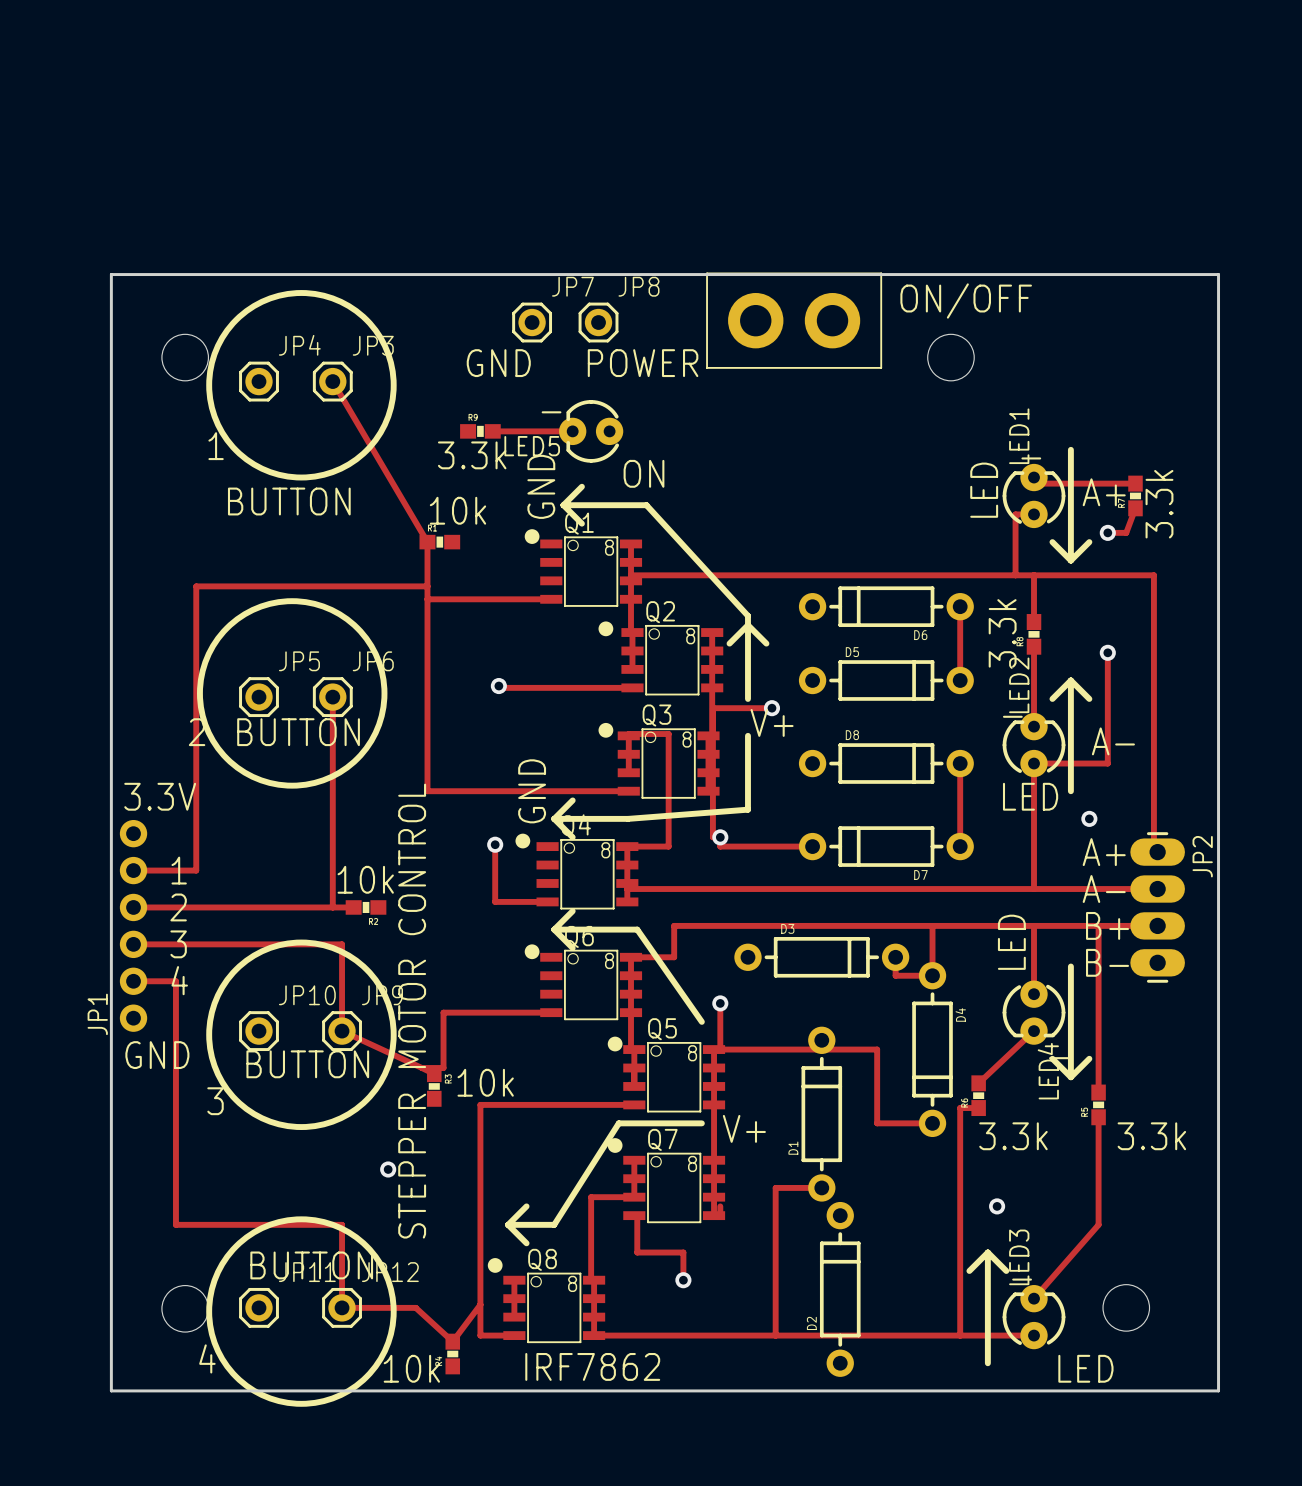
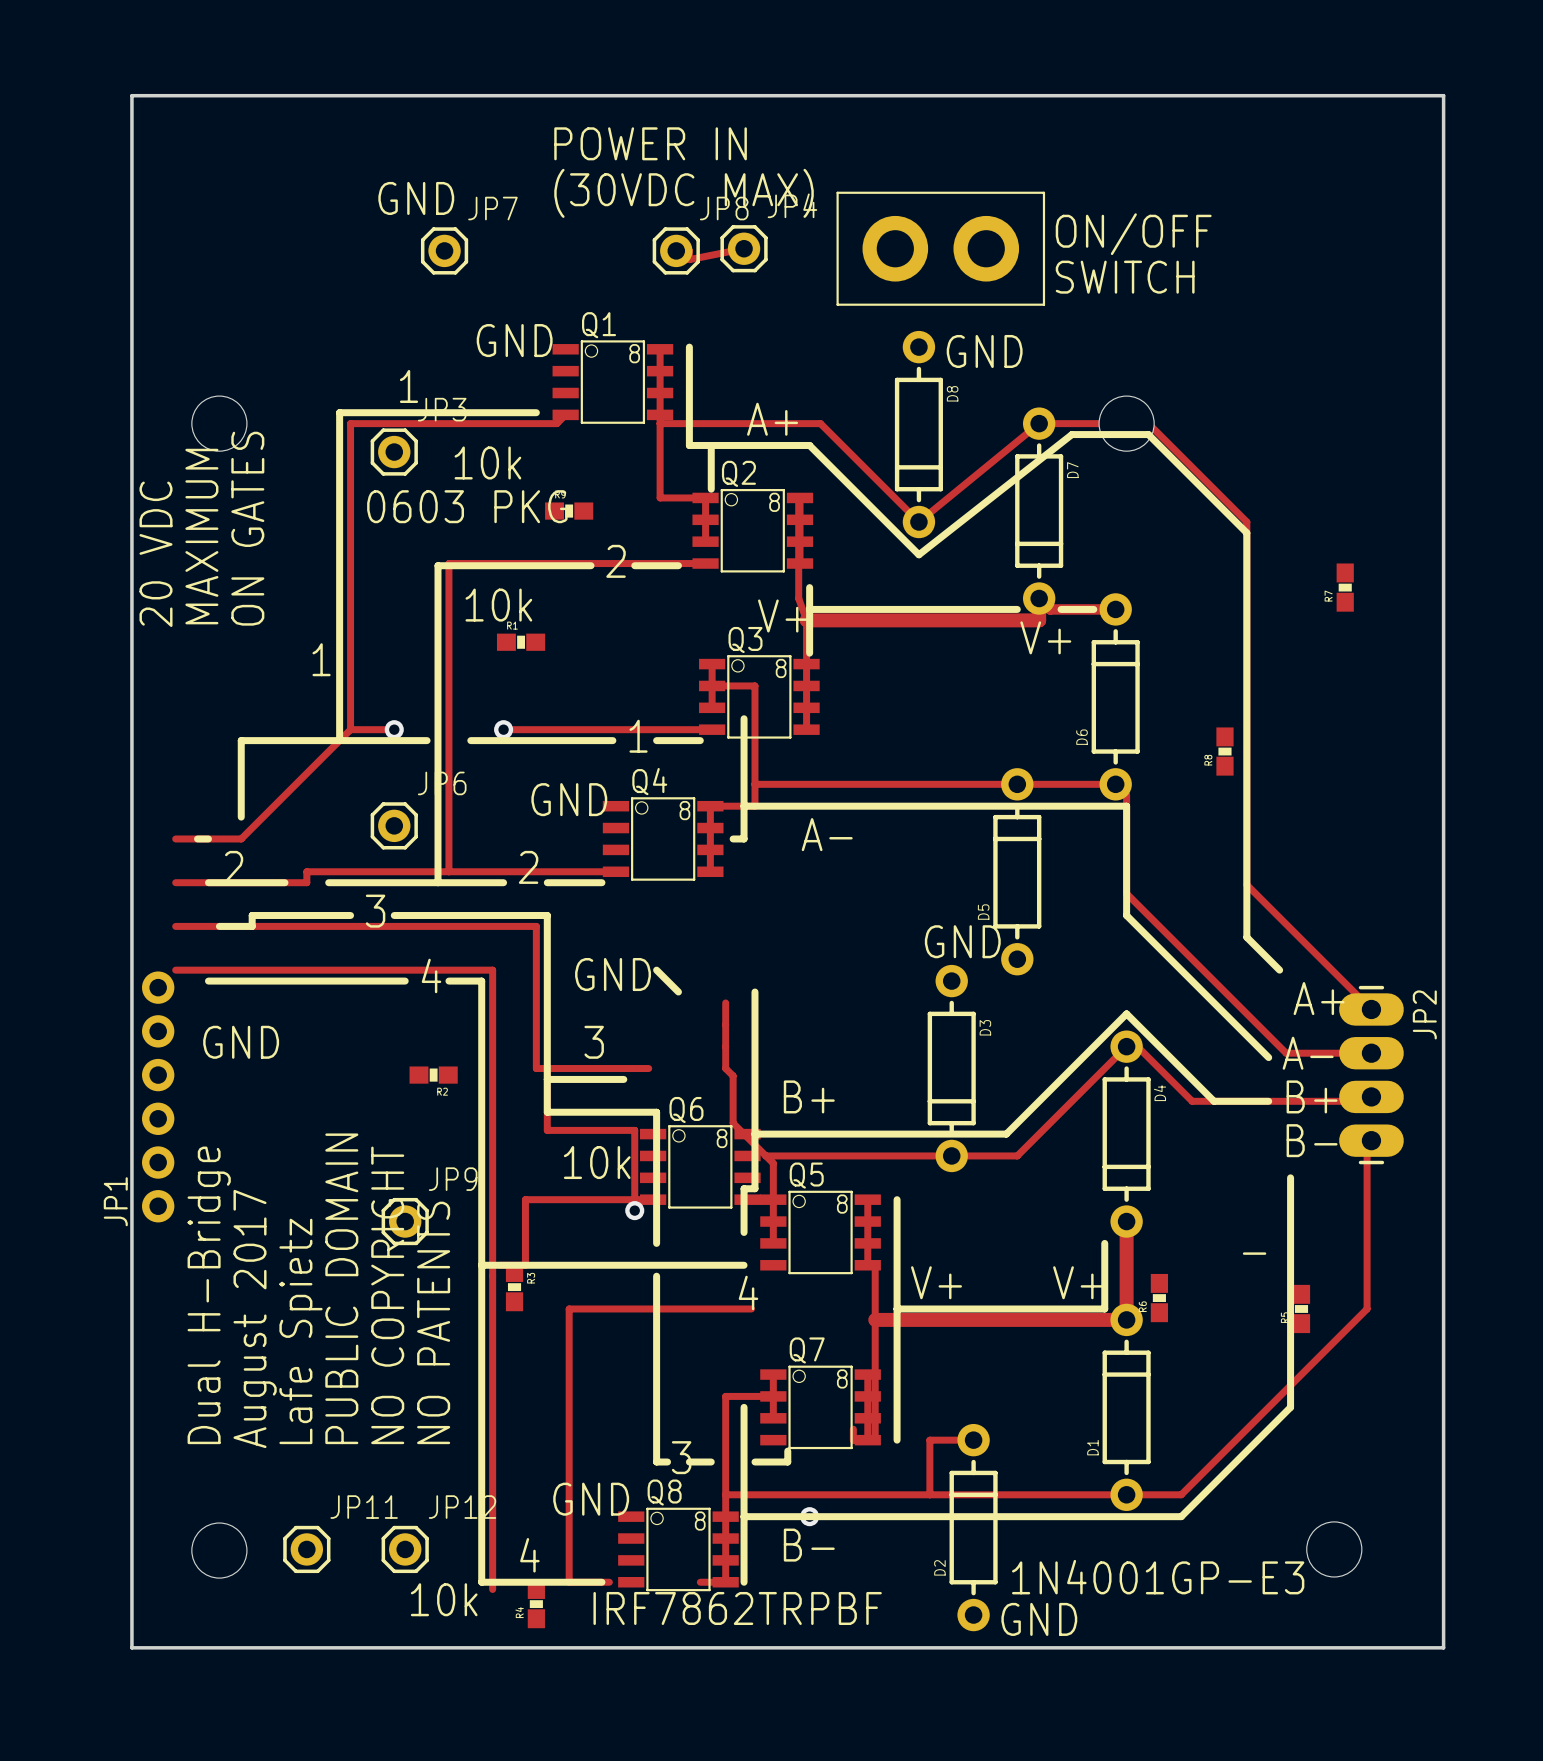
text: none -> POWER IN (650, 143)
text: none -> (30VDC MAX) (684, 193)
text: none -> GND (416, 198)
track: none -> (744, 248) (689, 259) (689, 250) (676, 250)
text: none -> SWITCH (1125, 277)
board edge: (111, 274) (1218, 274) -> (131, 325) (131, 95) (1443, 95) (1443, 325)
drawing: [206, 290, 397, 481] -> none
line: none -> (689, 347) (689, 445) (809, 445) (918, 554) (1071, 434) (1148, 434) (1246, 532) (1246, 937) (1279, 970)
track: none -> (660, 349) (660, 497) (705, 497) (705, 541)
text: none -> GND (984, 351)
text position: ON/OFF (966, 300) -> ON/OFF (1133, 234)
part position: (794, 320) -> (940, 248)
JP7 position: (532, 322) -> (444, 250)
JP8 position: (598, 322) -> (676, 250)
text: none -> 1 (409, 386)
line: none -> (536, 412) (339, 412) (339, 740)
track: none -> (565, 414) (556, 423) (350, 423) (350, 729)
text: none -> A+ (772, 419)
text position: GND (498, 363) -> GND (514, 340)
text: POWER (643, 363) -> none
line: none -> (711, 445) (711, 489)
JP4 position: (259, 381) -> (744, 248)
track: (332, 381) (427, 542) (427, 791) (628, 791) -> none
text: none -> 10k (487, 462)
text: - (551, 412) -> none
text: none -> 0603 PKG (467, 506)
track: (492, 431) (572, 431) -> none
LED5: (591, 431) -> none
text: none -> ON GATES (247, 528)
text: 1 (216, 446) -> none
line: (1070, 449) (1070, 560) -> none
text: none -> MAXIMUM (201, 536)
text: 3.3k (472, 455) -> none
text: - (1031, 458) -> none
text: none -> 20 VDC (155, 554)
text: none -> 2 (616, 561)
text: ON (643, 473) -> none
track: none -> (705, 563) (448, 563) (448, 871)
track: none -> (800, 563) (798, 497) (798, 598) (806, 620)
line: none -> (591, 565) (438, 565) (438, 882)
line: none -> (634, 565) (678, 565)
track: (1034, 477) (1034, 483) (1135, 483) -> none
text: GND (541, 486) -> none
line: (581, 486) (563, 505) -> none
text: LED (984, 490) -> none
text: A+ (1104, 492) -> none
line: none -> (809, 587) (809, 653)
LED1: (1034, 495) -> none
text: BUTTON (289, 501) -> none
text: 3.3k (1159, 504) -> none
line: (563, 505) (646, 505) (747, 615) (747, 698) -> none
line: (563, 505) (581, 523) -> none
track: (1135, 508) (1126, 532) (1107, 532) -> none
text position: 10k (457, 510) -> 10k (498, 605)
line: none -> (809, 609) (1017, 609)
line: none -> (1061, 609) (1093, 609)
track: none -> (1115, 609) (1050, 609) (1039, 598) (1039, 620) (806, 620)
track: (1034, 514) (1015, 514) (1015, 575) -> none
text: none -> V+ (783, 616)
track: none -> (806, 620) (806, 729)
drawing: [524, 529, 540, 544] -> none
via: (1107, 532) -> none
text: none -> V+ (1045, 637)
line: (1052, 542) (1070, 560) -> none
line: (1089, 542) (1070, 560) -> none
track: (631, 543) (632, 669) -> none
text: none -> 1 (321, 659)
track: none -> (712, 664) (712, 707)
Q1 position: (591, 571) -> (612, 382)
track: (631, 575) (1153, 575) (1153, 852) (1157, 852) -> (660, 423) (820, 423) (918, 522) (1039, 423) (1148, 423) (1246, 522) (1246, 884) (1371, 1009)
track: (1034, 575) (1034, 622) -> none
track: none -> (712, 685) (754, 685) (754, 806) (710, 806) (710, 871)
track: (427, 586) (196, 586) (196, 870) (133, 870) -> none
drawing: [197, 598, 388, 789] -> none
track: (427, 599) (551, 599) -> none
line: none -> (744, 718) (744, 838) (733, 838)
D6 rotation: 0° (886, 606) -> 90° clockwise (1115, 696)
track: (960, 606) (960, 680) -> none
track: none -> (350, 729) (241, 838) (175, 838)
track: none -> (350, 729) (394, 729)
via: none -> (394, 729)
track: none -> (503, 729) (712, 729)
via: none -> (503, 729)
text: none -> 1 (638, 736)
drawing: [598, 621, 614, 637] -> none
line: none -> (427, 740) (241, 740) (241, 817)
line: none -> (470, 740) (612, 740)
line: none -> (656, 740) (700, 740)
track: (712, 632) (712, 735) (708, 735) (708, 791) (712, 791) -> none
text: 3.3k (1002, 633) -> none
line: (729, 643) (747, 625) (766, 643) -> none
track: (1034, 646) (1034, 726) -> none
track: (1107, 652) (1107, 763) (1034, 763) (1034, 889) -> none
via: (1107, 652) -> none
Q2 position: (672, 660) -> (752, 530)
text: none -> GND (569, 799)
line: none -> (744, 806) (1126, 806) (1126, 915) (1268, 1057)
D5 rotation: 0° (886, 680) -> 90° counterclockwise (1017, 871)
line: (1070, 680) (1070, 791) -> none
line: (1070, 680) (1052, 698) -> none
line: (1070, 680) (1089, 698) -> none
track: (498, 686) (498, 687) (632, 687) -> none
via: (498, 686) -> none
JP5: (259, 697) -> none
track: (332, 697) (332, 907) -> none
text: none -> A- (827, 834)
line: none -> (197, 838) (208, 838)
track: (771, 708) (712, 708) (712, 837) (720, 837) (720, 846) (812, 846) -> none
via: (771, 708) -> none
text: - (1012, 716) -> none
drawing: [598, 722, 614, 738] -> none
text: V+ (772, 722) -> none
text: BUTTON (298, 732) -> none
text: none -> 2 (528, 867)
track: none -> (615, 871) (306, 871) (306, 882) (175, 882)
line: (747, 735) (747, 809) (628, 818) (554, 818) (572, 800) -> none
text: A- (1113, 741) -> none
line: none -> (208, 882) (284, 882)
line: none -> (328, 882) (503, 882)
line: none -> (547, 882) (601, 882)
LED2: (1034, 745) -> none
Q3 position: (668, 763) -> (759, 696)
D8 rotation: 0° (886, 763) -> 90° clockwise (918, 434)
D8 position: (886, 763) -> (918, 434)
track: (960, 763) (960, 846) -> none
text: none -> 3 (375, 911)
line: none -> (350, 915) (252, 915) (252, 926) (219, 926)
line: none -> (394, 915) (547, 915) (547, 1112) (656, 1112) (656, 1243)
track: (628, 772) (628, 734) (668, 734) (668, 846) (627, 846) (627, 901) -> none
text rotation: 0° (532, 791) -> 90° clockwise (613, 974)
text: none -> GND (962, 941)
text: 3.3V (160, 796) -> none
text: LED (1030, 796) -> none
track: none -> (175, 970) (492, 970) (492, 1589)
via: (1089, 818) -> none
text: none -> 4 (431, 975)
line: none -> (208, 981) (405, 981)
line: none -> (448, 981) (481, 981) (481, 1582) (601, 1582)
drawing: [515, 833, 531, 849] -> none
line: none -> (754, 992) (754, 1188) (744, 1188) (744, 1232)
via: (720, 837) -> none
track: (495, 844) (495, 901) -> (175, 926) (536, 926) (536, 1068) (586, 1068)
via: (495, 844) -> none
track: none -> (725, 1002) (725, 1068) (733, 1075) (733, 1123) (773, 1163) (773, 1243)
D7 rotation: 0° (886, 846) -> 90° counterclockwise (1039, 511)
D7 position: (886, 846) -> (1039, 511)
text position: A+ (1104, 852) -> A+ (1319, 998)
text: 1 (179, 870) -> none
Q4 position: (587, 874) -> (663, 838)
text: 10k (365, 879) -> none
text: none -> 3 (594, 1042)
track: (627, 889) (1085, 889) -> (754, 784) (1115, 784) (1126, 795) (1126, 893) (1286, 1053)
track: none -> (547, 1068) (547, 1130) (634, 1130) (634, 1210)
track: (133, 907) (353, 907) -> none
text: 2 (178, 907) -> none
line: none -> (547, 1079) (623, 1079)
line: (572, 911) (554, 929) -> none
text: none -> B+ (809, 1096)
track: (932, 925) (932, 975) (895, 975) (895, 957) -> none
track: (1034, 925) (1034, 994) -> none
track: (1098, 925) (1098, 1092) -> none
track: (1157, 925) (674, 925) (674, 957) (631, 957) (631, 1049) (634, 1049) (634, 1086) -> (1371, 1096) (1367, 1101) (1192, 1101) (1137, 1046) (1126, 1046) (1017, 1155) (765, 1155)
line: (554, 929) (637, 929) (701, 1021) -> none
line: (554, 929) (572, 948) -> none
line: none -> (1268, 1101) (1214, 1101) (1126, 1013) (1006, 1134) (754, 1134)
drawing: [206, 939, 397, 1131] -> none
text: LED (1011, 942) -> none
track: (133, 944) (342, 944) (342, 1031) (434, 1074) -> none
text: 3 (178, 944) -> none
drawing: [524, 944, 540, 960] -> none
D3 rotation: 0° (821, 957) -> 90° clockwise (951, 1068)
track: none -> (1371, 1140) (1367, 1145) (1367, 1308) (1181, 1494) (725, 1494)
line: (1070, 966) (1070, 1077) -> none
text: 4 (179, 980) -> none
track: (133, 981) (175, 981) (175, 1224) (342, 1224) (342, 1307) (415, 1307) (452, 1341) (480, 1304) -> none
text: none -> 10k (597, 1162)
line: none -> (1290, 1177) (1290, 1407) (1181, 1516) (744, 1516)
track: (720, 1003) (720, 1049) -> none
via: (720, 1003) -> none
text: STEPPER MOTOR CONTROL (412, 1011) -> none
line: none -> (897, 1199) (897, 1440)
LED4: (1034, 1012) -> none
via: none -> (634, 1210)
JP10: (259, 1031) -> none
track: none -> (1126, 1221) (1126, 1319) (875, 1319)
track: (1034, 1031) (978, 1083) -> none
drawing: [607, 1036, 623, 1052] -> none
line: none -> (1104, 1243) (1104, 1308) (897, 1308)
D4 position: (932, 1049) -> (1126, 1134)
text position: GND (157, 1055) -> GND (241, 1042)
line: (1052, 1058) (1070, 1077) -> none
line: (1089, 1058) (1070, 1077) -> none
text: BUTTON (307, 1064) -> none
line: none -> (481, 1265) (744, 1265)
line: none -> (656, 1276) (656, 1462) (667, 1462)
Q5 position: (674, 1077) -> (820, 1232)
text: 10k (485, 1082) -> none
text: none -> V+ (1078, 1282)
text: none -> PUBLIC DOMAIN (341, 1288)
text: none -> 4 (748, 1292)
text: none -> Dual H-Bridge (209, 1295)
text: none -> NO COPYRIGHT (387, 1295)
text: 3 (215, 1101) -> none
track: (978, 1108) (960, 1108) (960, 1335) -> none
text: none -> August 2017 (255, 1318)
D1 position: (821, 1114) -> (1126, 1407)
text: none -> NO PATENTS (433, 1322)
track: (1098, 1117) (1098, 1224) (1034, 1298) -> none
text: none -> Lafe Spietz (301, 1331)
line: (701, 1123) (618, 1123) (554, 1224) (508, 1224) -> none
track: (932, 1123) (877, 1123) (877, 1049) (714, 1049) (714, 1215) (720, 1215) -> (867, 1199) (867, 1265) (875, 1265) (875, 1440) (853, 1440)
text position: V+ (744, 1128) -> V+ (936, 1282)
text: 3.3k (1013, 1136) -> none
text: 3.3k (1151, 1136) -> none
drawing: [607, 1138, 623, 1153] -> none
track: (634, 1160) (634, 1197) (591, 1197) (591, 1280) (594, 1280) (594, 1335) -> none
track: none -> (867, 1374) (867, 1440)
via: (388, 1169) -> none
line: none -> (744, 1407) (744, 1582)
Q7 position: (674, 1187) -> (820, 1407)
track: (821, 1187) (775, 1187) (775, 1335) -> none
line: (526, 1206) (508, 1224) -> none
via: (997, 1206) -> none
track: (634, 1215) (637, 1215) (637, 1252) (683, 1252) (683, 1280) -> none
track: none -> (973, 1440) (929, 1440) (929, 1494)
drawing: [206, 1216, 397, 1407] -> none
line: (508, 1224) (526, 1243) -> none
line: none -> (787, 1451) (787, 1462) (754, 1462)
text: none -> 3 (681, 1457)
line: none -> (689, 1462) (711, 1462)
line: (987, 1252) (987, 1363) -> none
line: (987, 1252) (969, 1270) -> none
line: (987, 1252) (1006, 1270) -> none
drawing: [487, 1258, 503, 1273] -> none
text: BUTTON (311, 1265) -> none
text: none -> GND (591, 1499)
text: - (1022, 1279) -> none
track: (514, 1280) (514, 1317) -> (773, 1374) (773, 1418)
D2 position: (840, 1289) -> (973, 1527)
text: none -> B- (809, 1545)
Q8 position: (554, 1307) -> (678, 1549)
text: none -> 4 (529, 1555)
LED3: (1034, 1317) -> none
text: none -> 1N4001GP-E3 (1158, 1577)
track: (612, 1335) (1034, 1335) -> (725, 1582) (725, 1396) (773, 1396)
text: 4 (207, 1358) -> none
text: IRF7862 (592, 1366) -> IRF7862TRPBF (737, 1608)
text: none -> GND (1039, 1619)
text position: 10k (411, 1368) -> 10k (444, 1599)
text: LED (1085, 1368) -> none

